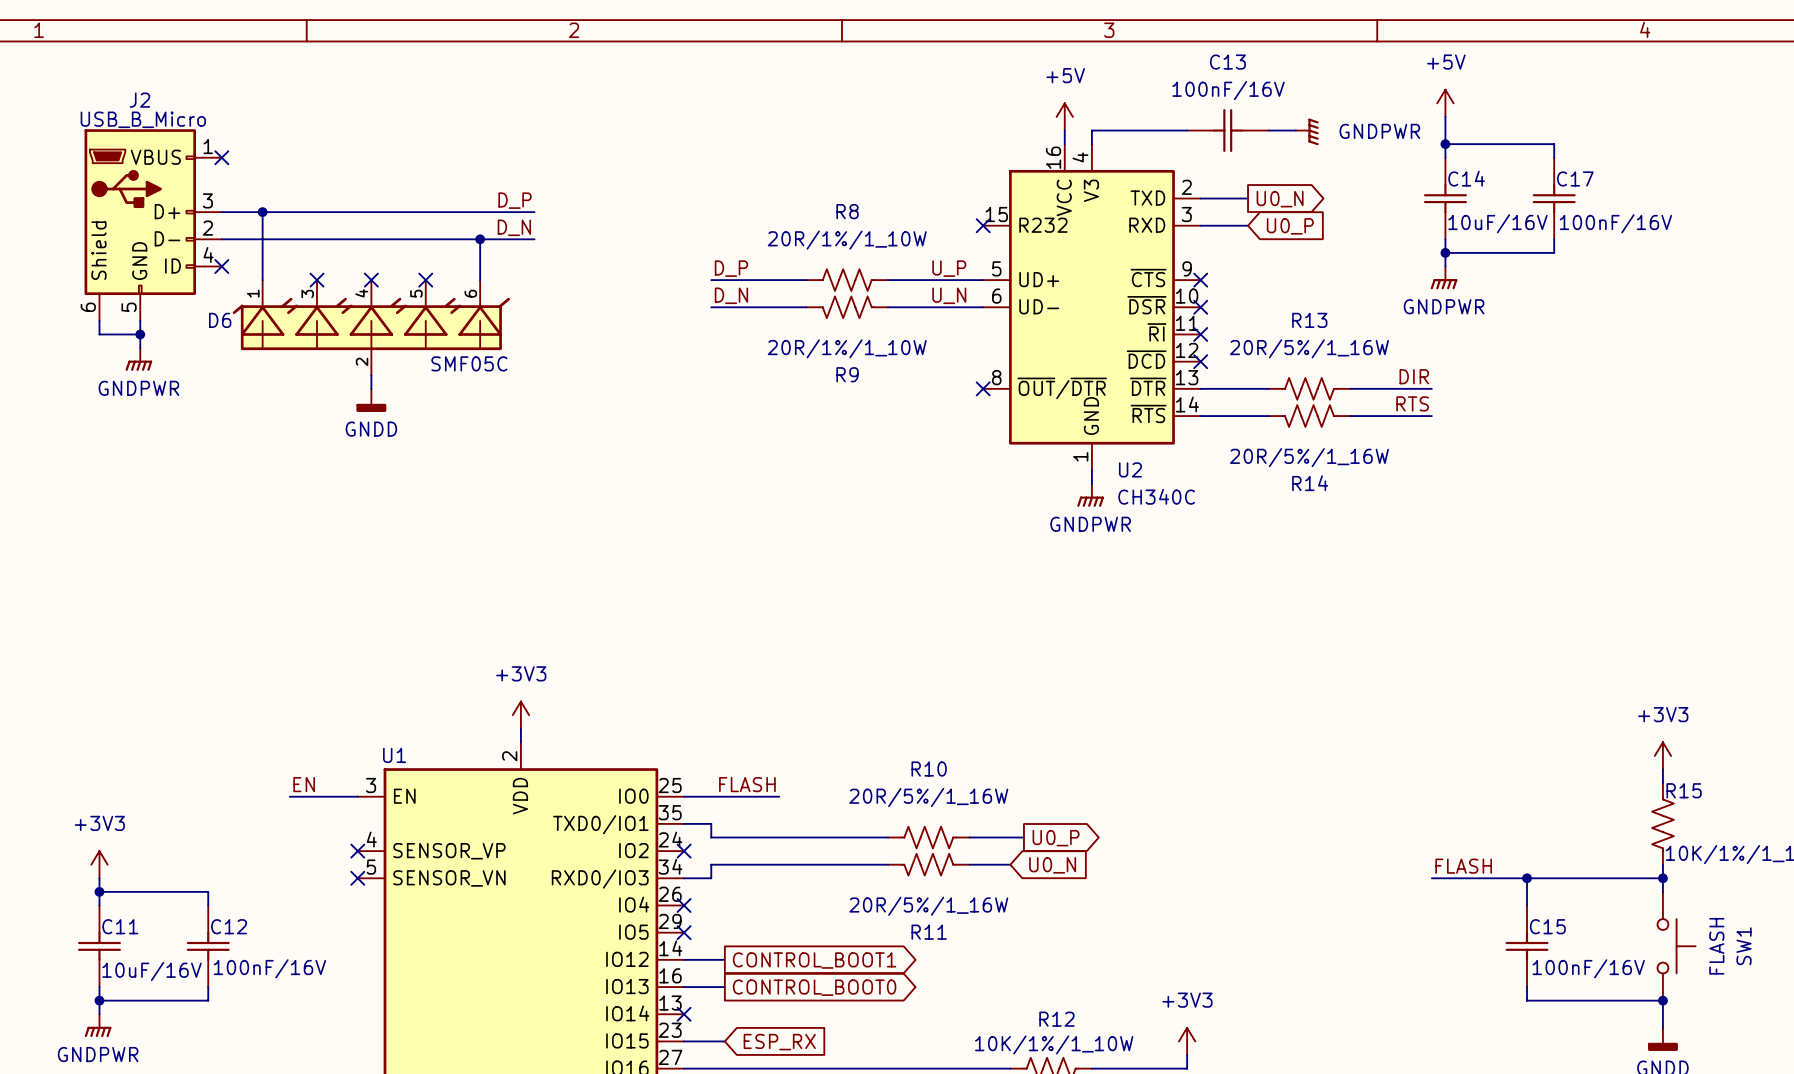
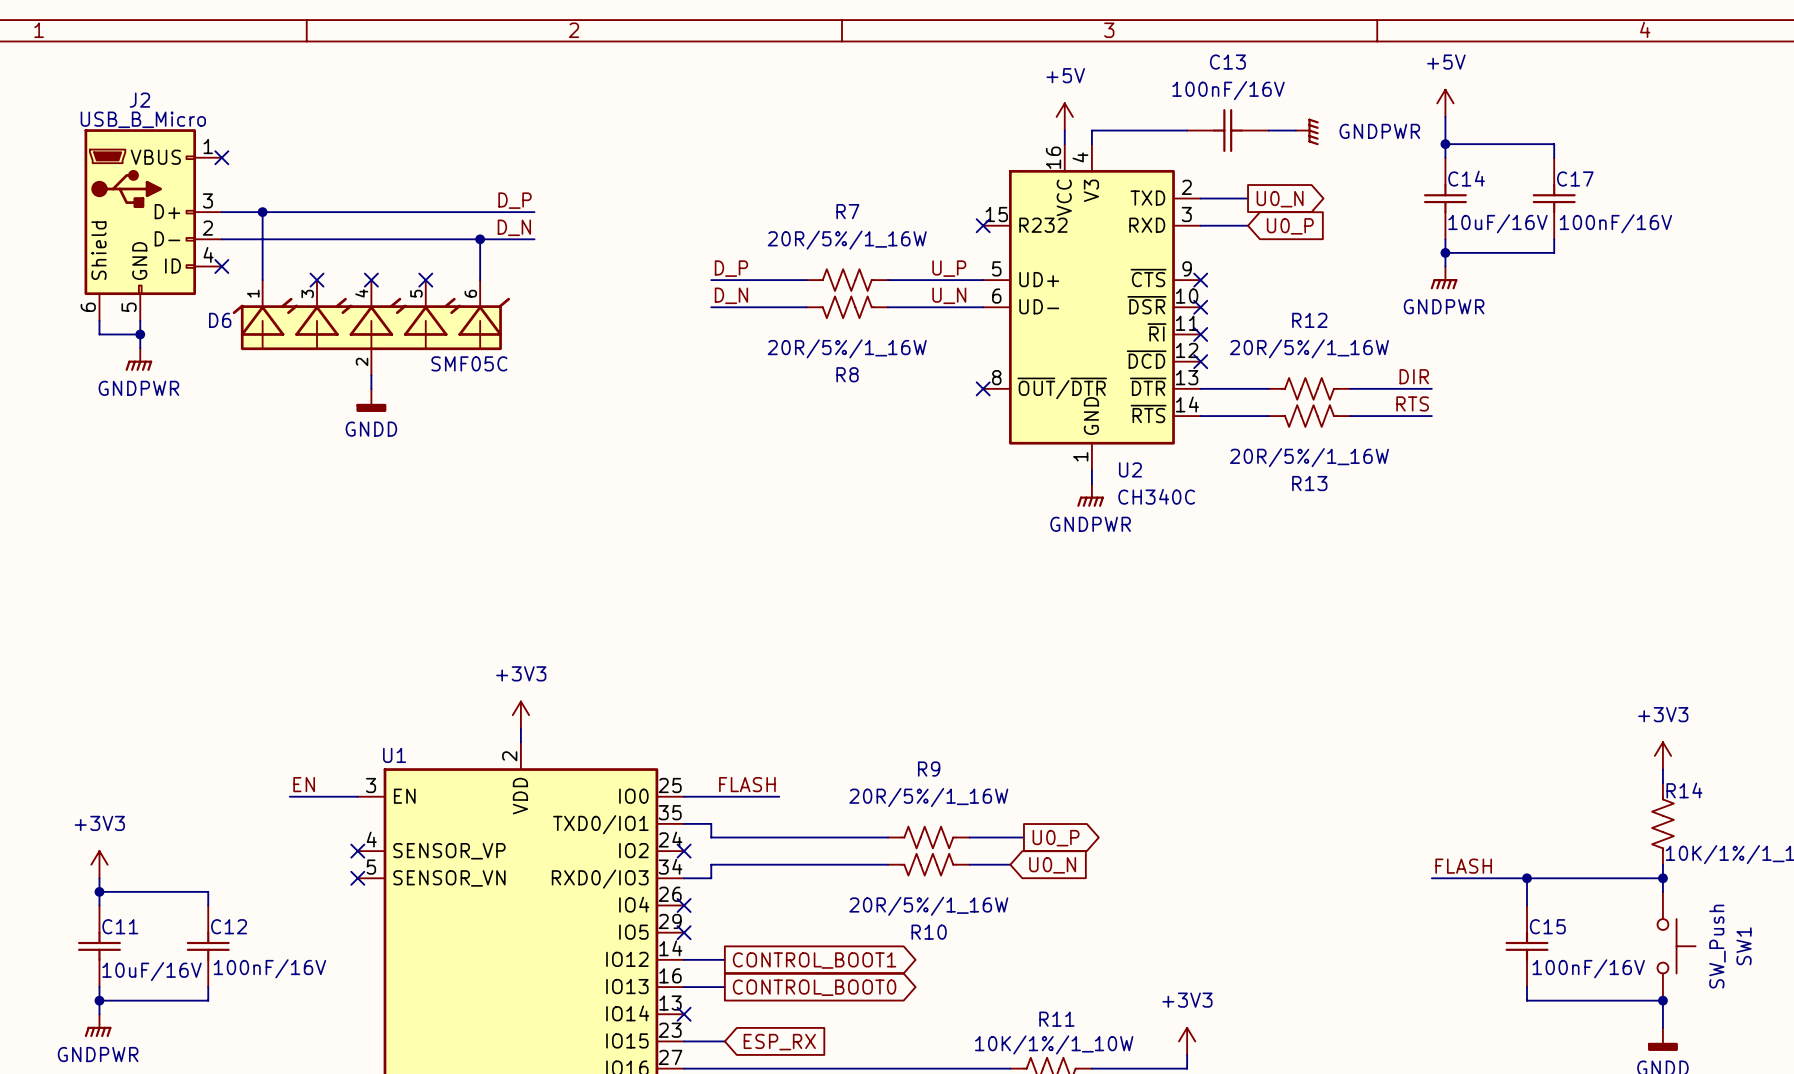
R8 name: R8 (847, 211) -> R7 (847, 211)
R8 value: 20R/1%/1_10W (847, 240) -> 20R/5%/1_16W (847, 240)
R13 name: R13 (1309, 320) -> R12 (1309, 320)
R9 value: 20R/1%/1_10W (847, 348) -> 20R/5%/1_16W (847, 348)
R9 name: R9 (847, 374) -> R8 (847, 374)
R14 name: R14 (1310, 483) -> R13 (1309, 483)
R10 name: R10 (929, 769) -> R9 (929, 769)
R15 name: R15 (1684, 790) -> R14 (1684, 790)
R11 name: R11 (929, 932) -> R10 (929, 932)
SW1 value: FLASH (1716, 946) -> SW_Push (1717, 946)
R12 name: R12 (1056, 1019) -> R11 (1056, 1019)

